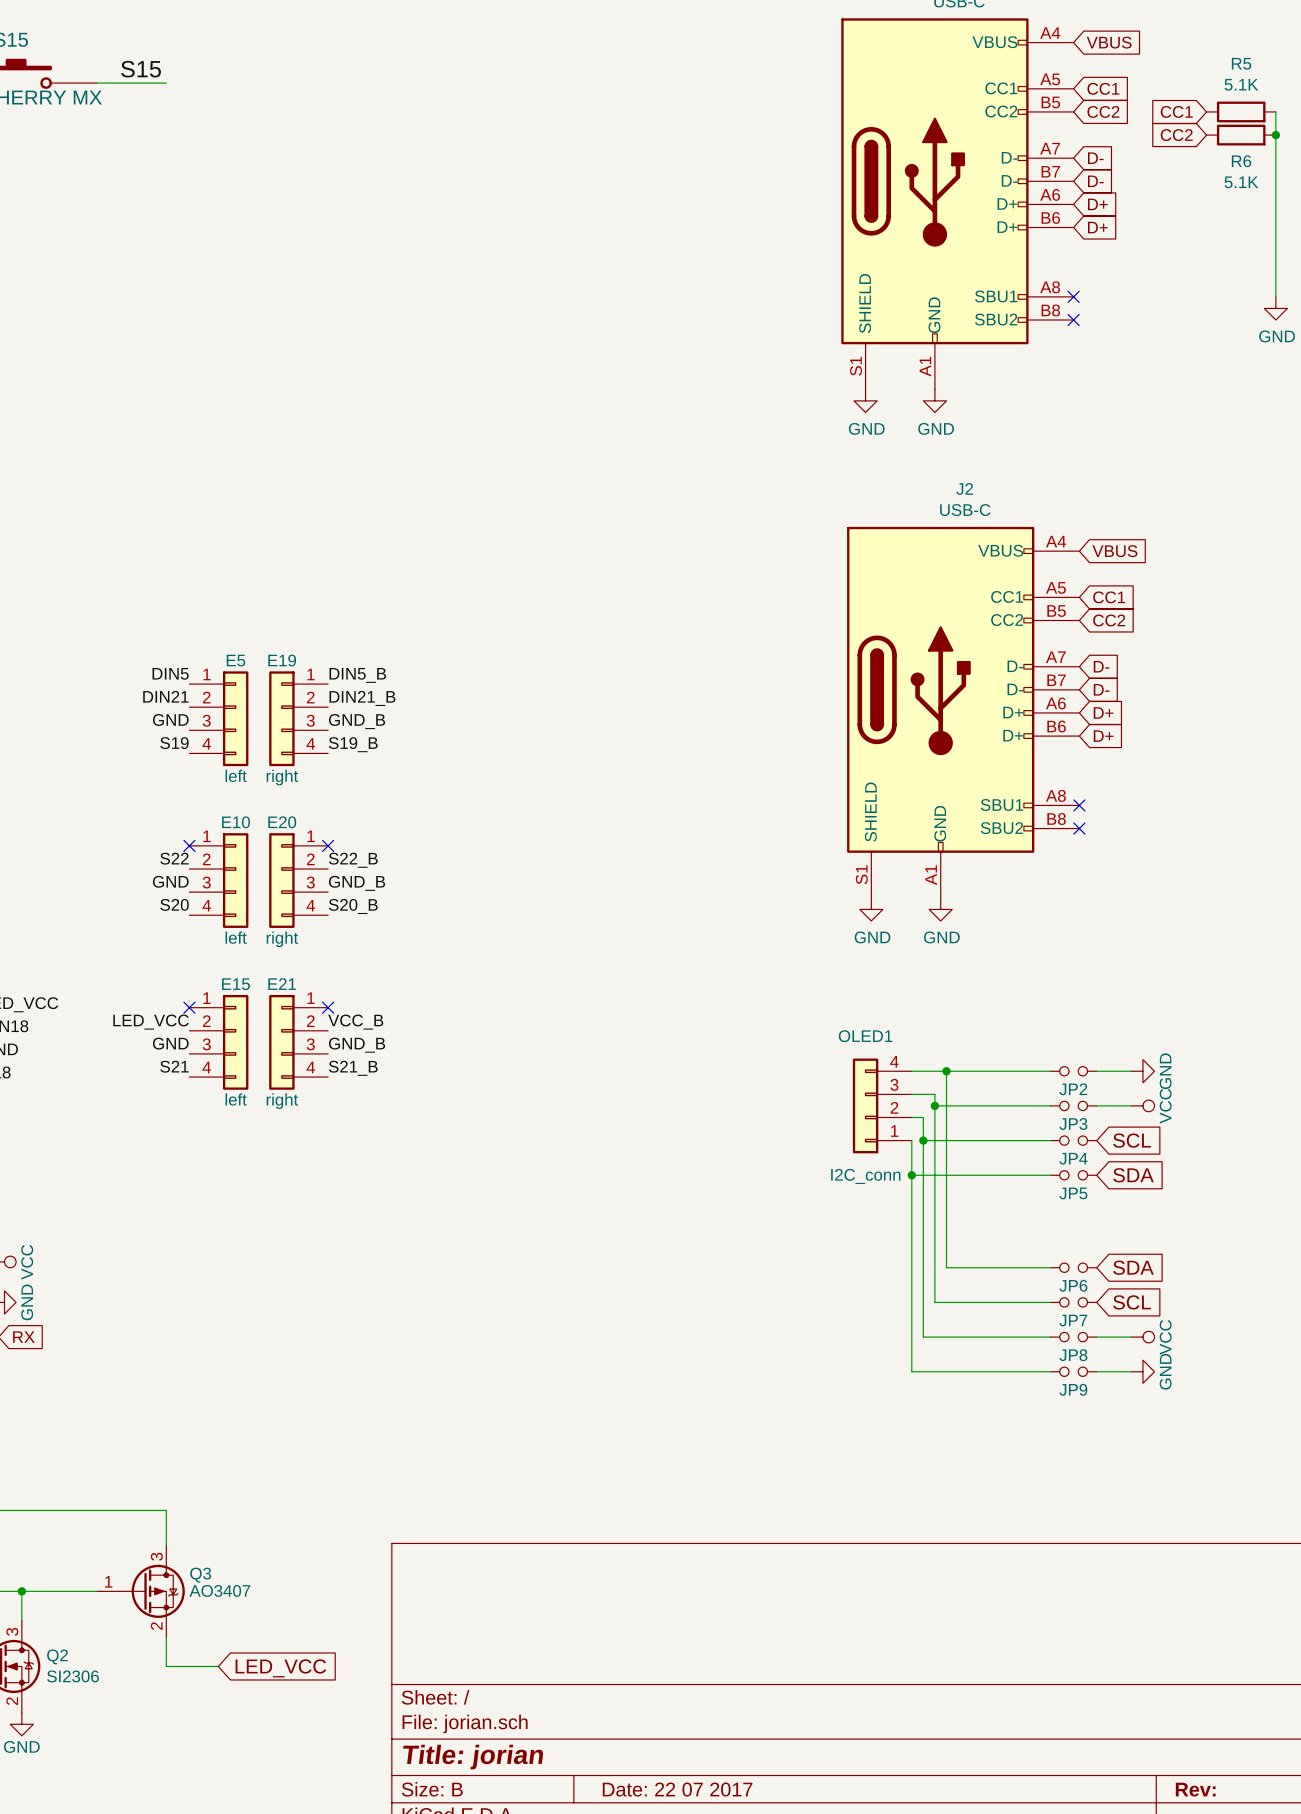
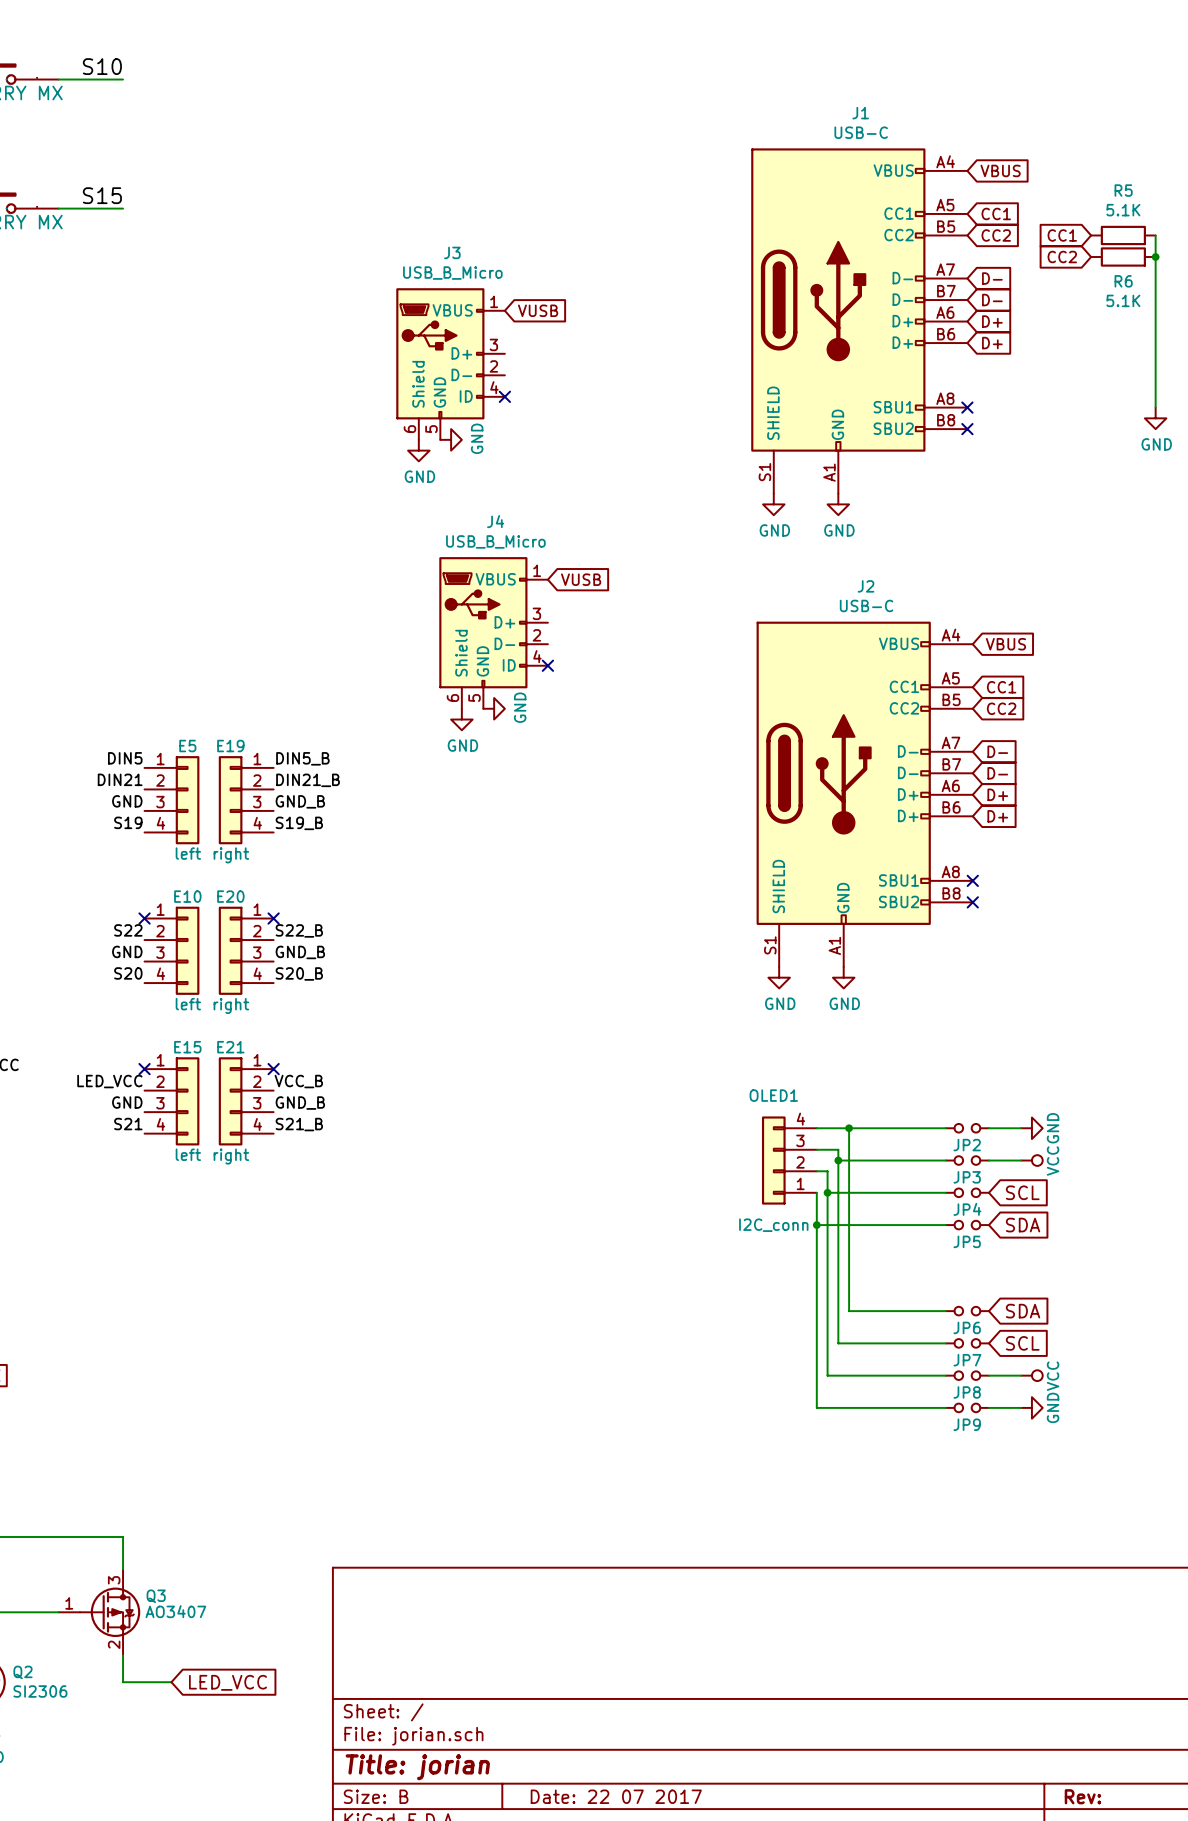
global label: none -> VUSB (538, 310)
J3: none -> USB_B_Micro (450, 364)
no-connect mark: none -> (504, 396)
power symbol: none -> GND (451, 439)
power symbol: none -> GND (418, 450)
global label: none -> VUSB (581, 579)
J4: none -> USB_B_Micro (493, 632)
no-connect mark: none -> (547, 665)
power symbol: none -> GND (494, 708)
power symbol: none -> GND (461, 719)

